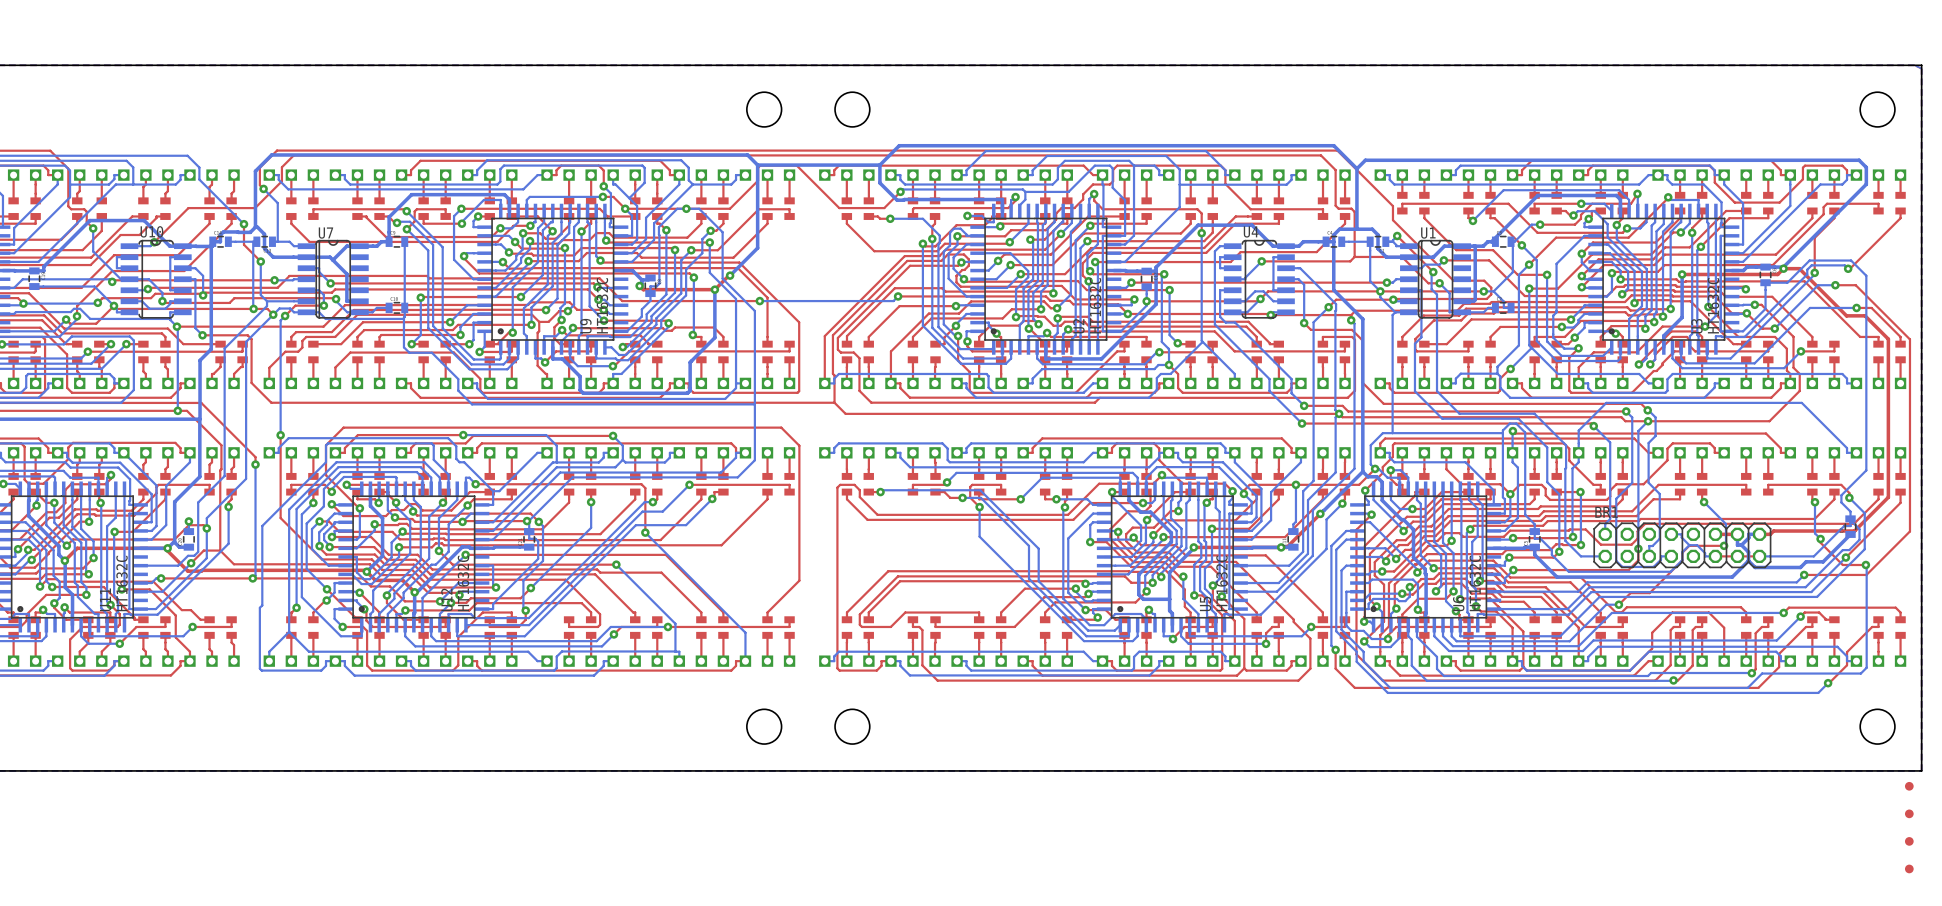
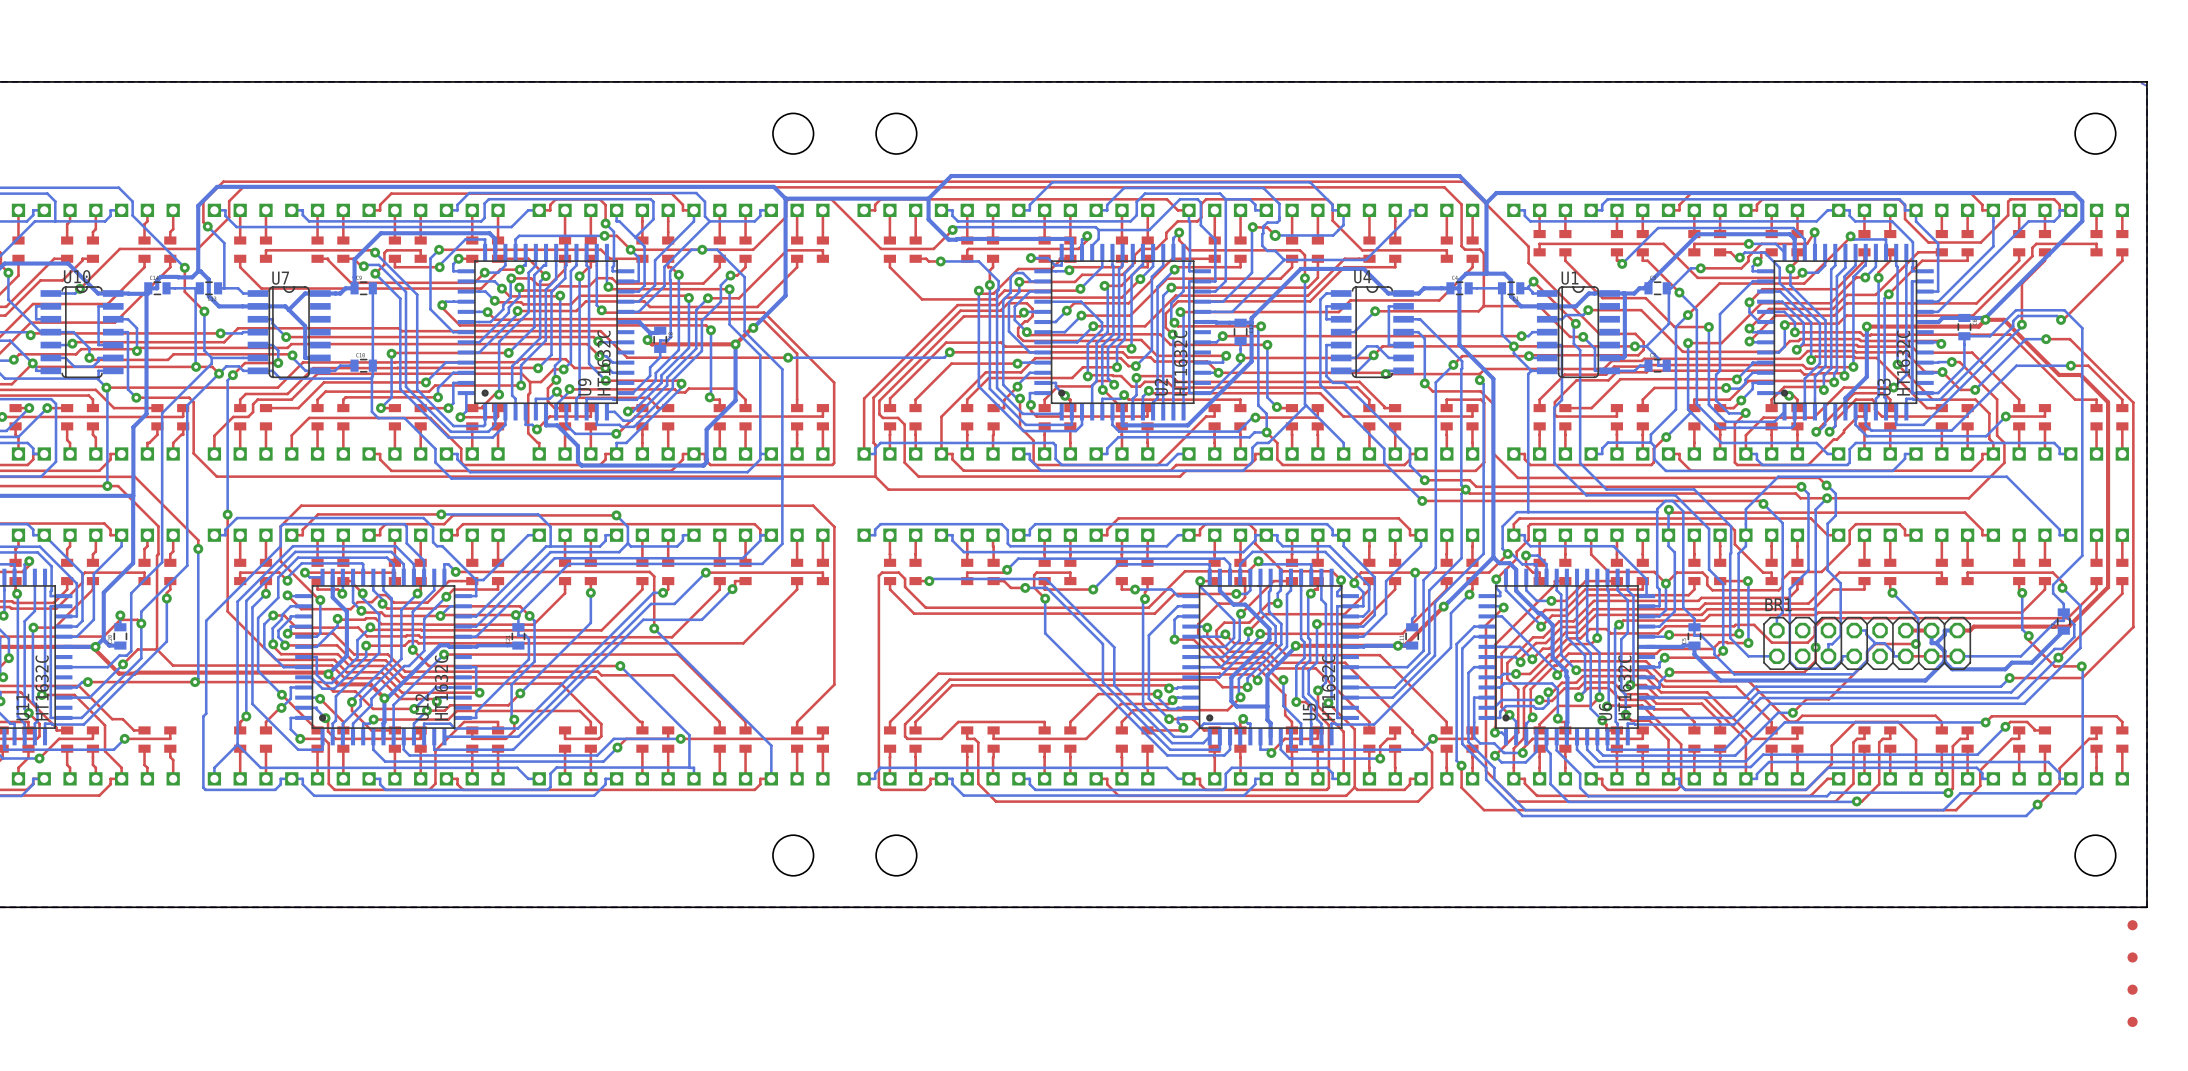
bottom track: (1179, 169) (1179, 207) (1125, 261) -> (1284, 259) (1232, 311) (1215, 311)
bottom track: none -> (1279, 203) (1279, 220) (1277, 222) (1267, 222) (1263, 226) (1262, 245) (1267, 250) (1275, 250) (1284, 259)
bottom track: none -> (1343, 210) (1343, 225) (1333, 235) (1275, 235)
bottom track: (1286, 184) (1179, 184) -> (1404, 221) (1365, 259) (1284, 259)
top track: none -> (1252, 227) (1267, 227) (1275, 235)
bottom track: none -> (1252, 227) (1252, 272) (1223, 301) (1202, 301)
via: none -> (1252, 227)
via: none -> (1275, 235)

